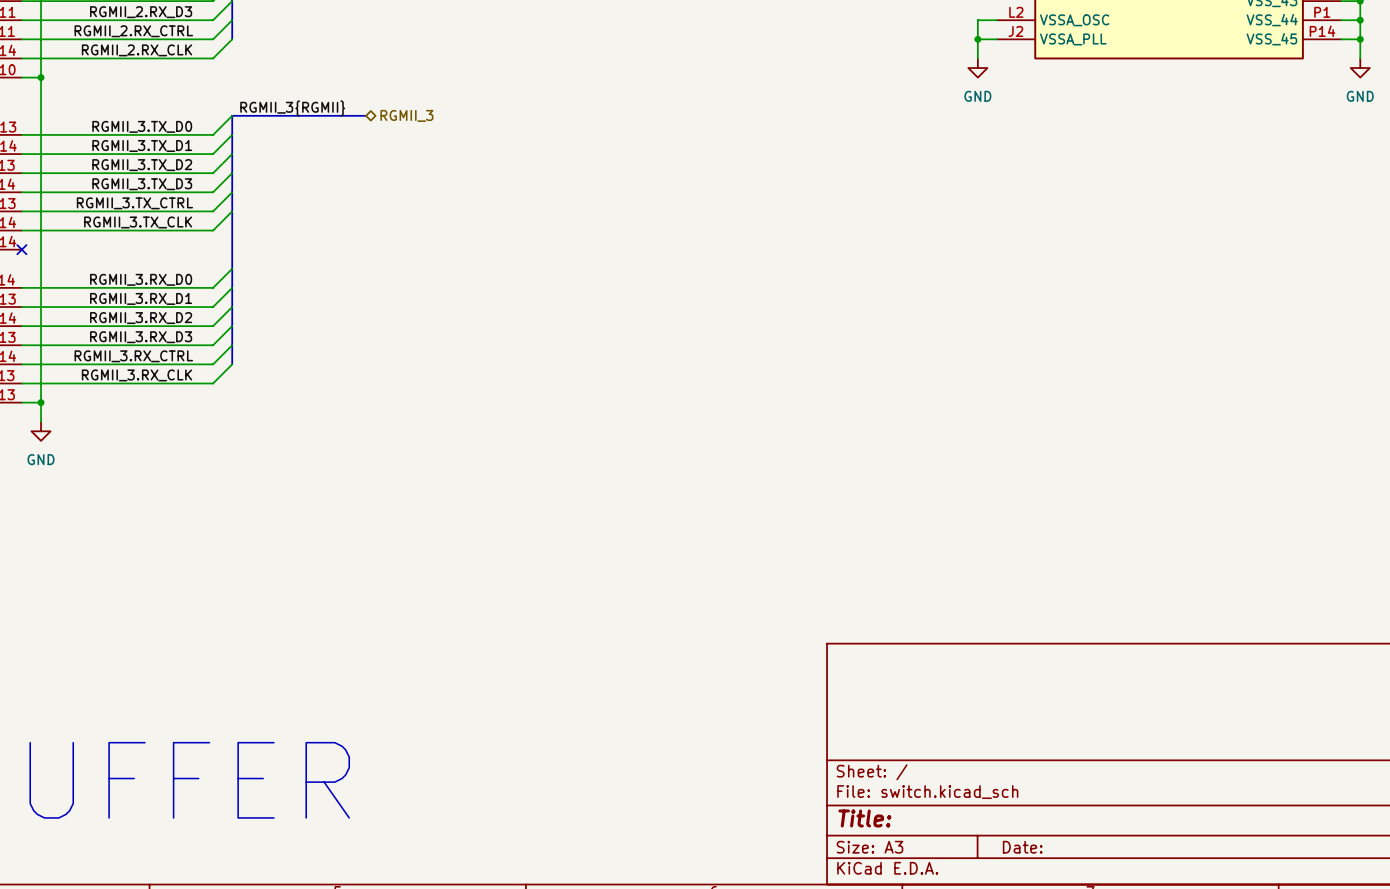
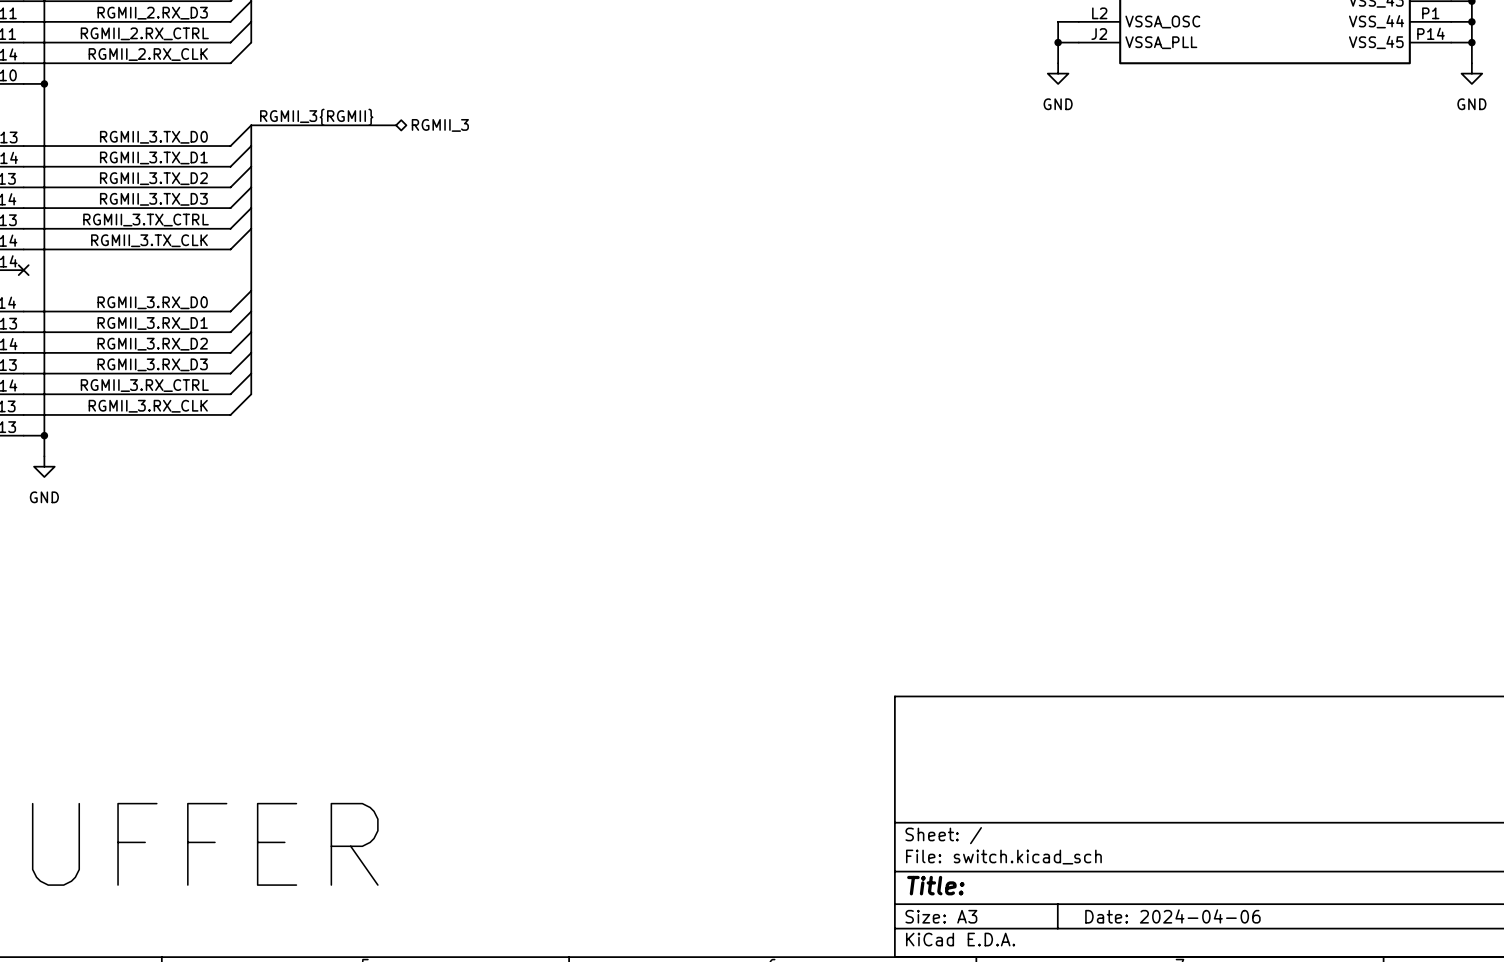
title block: Date: (1022, 847) -> Date: 2024-04-06 (1172, 916)

